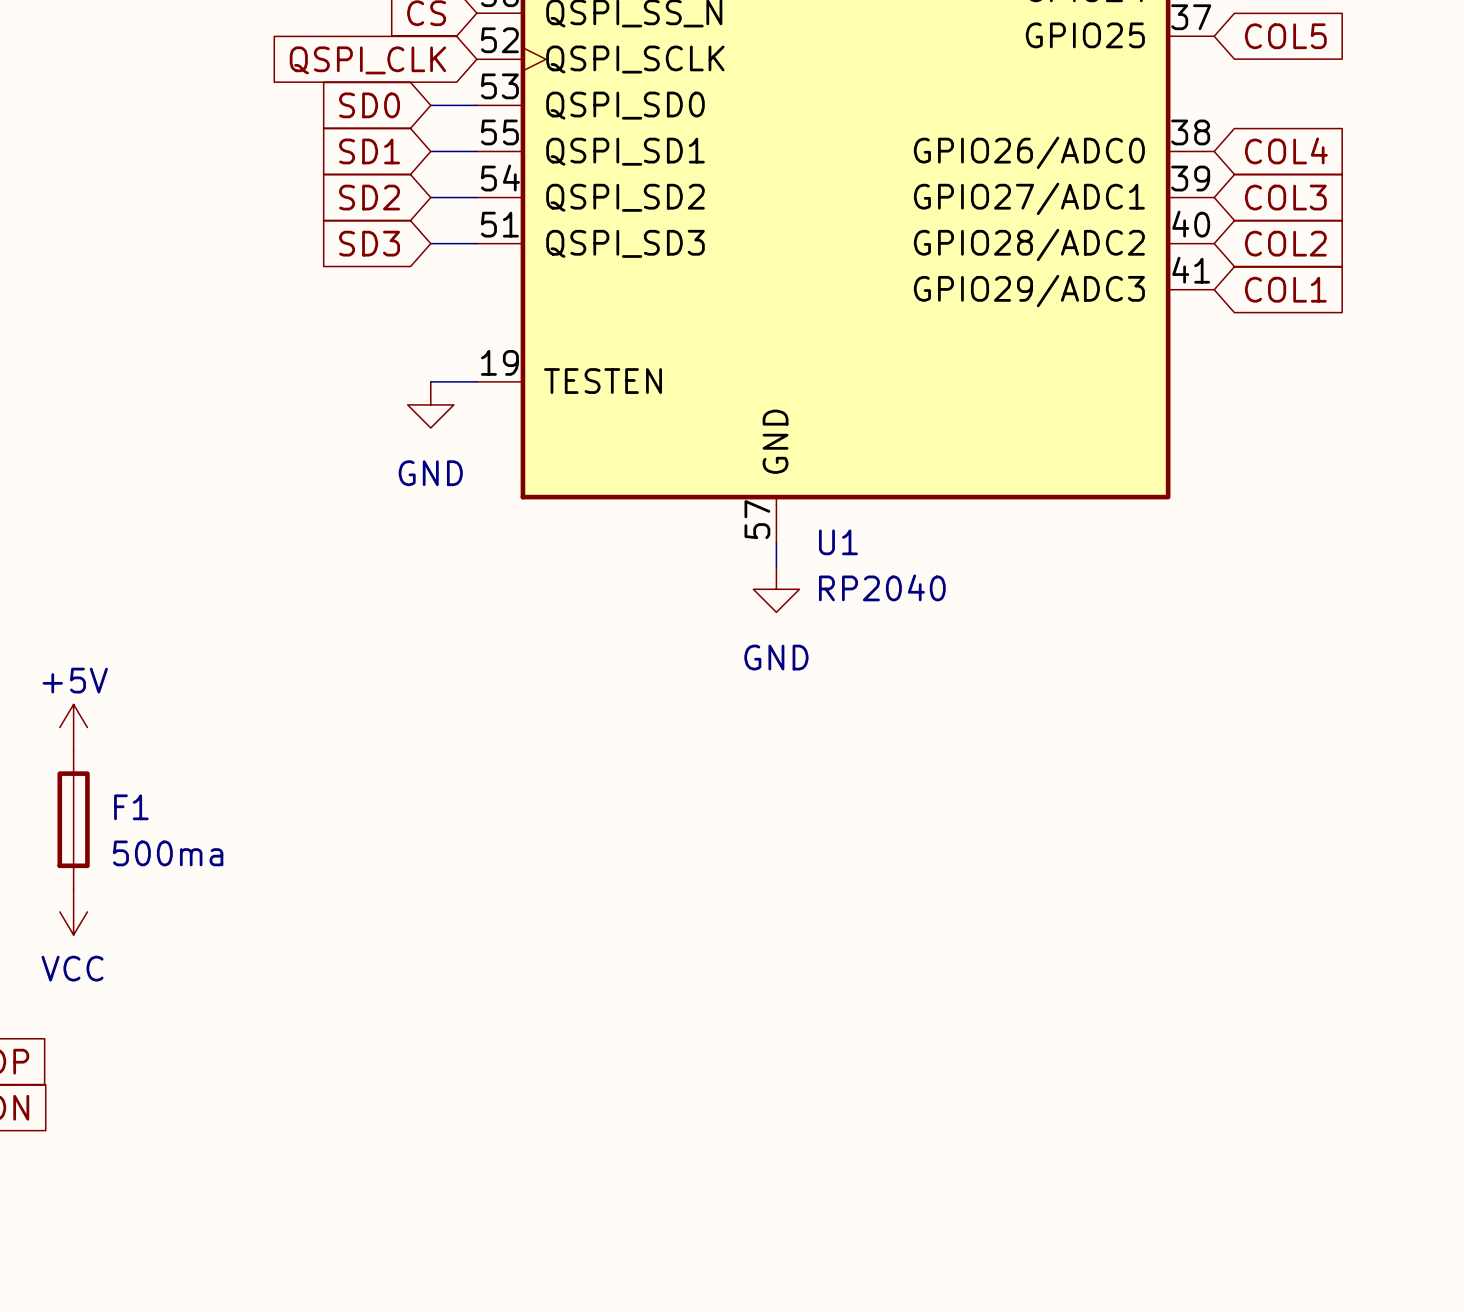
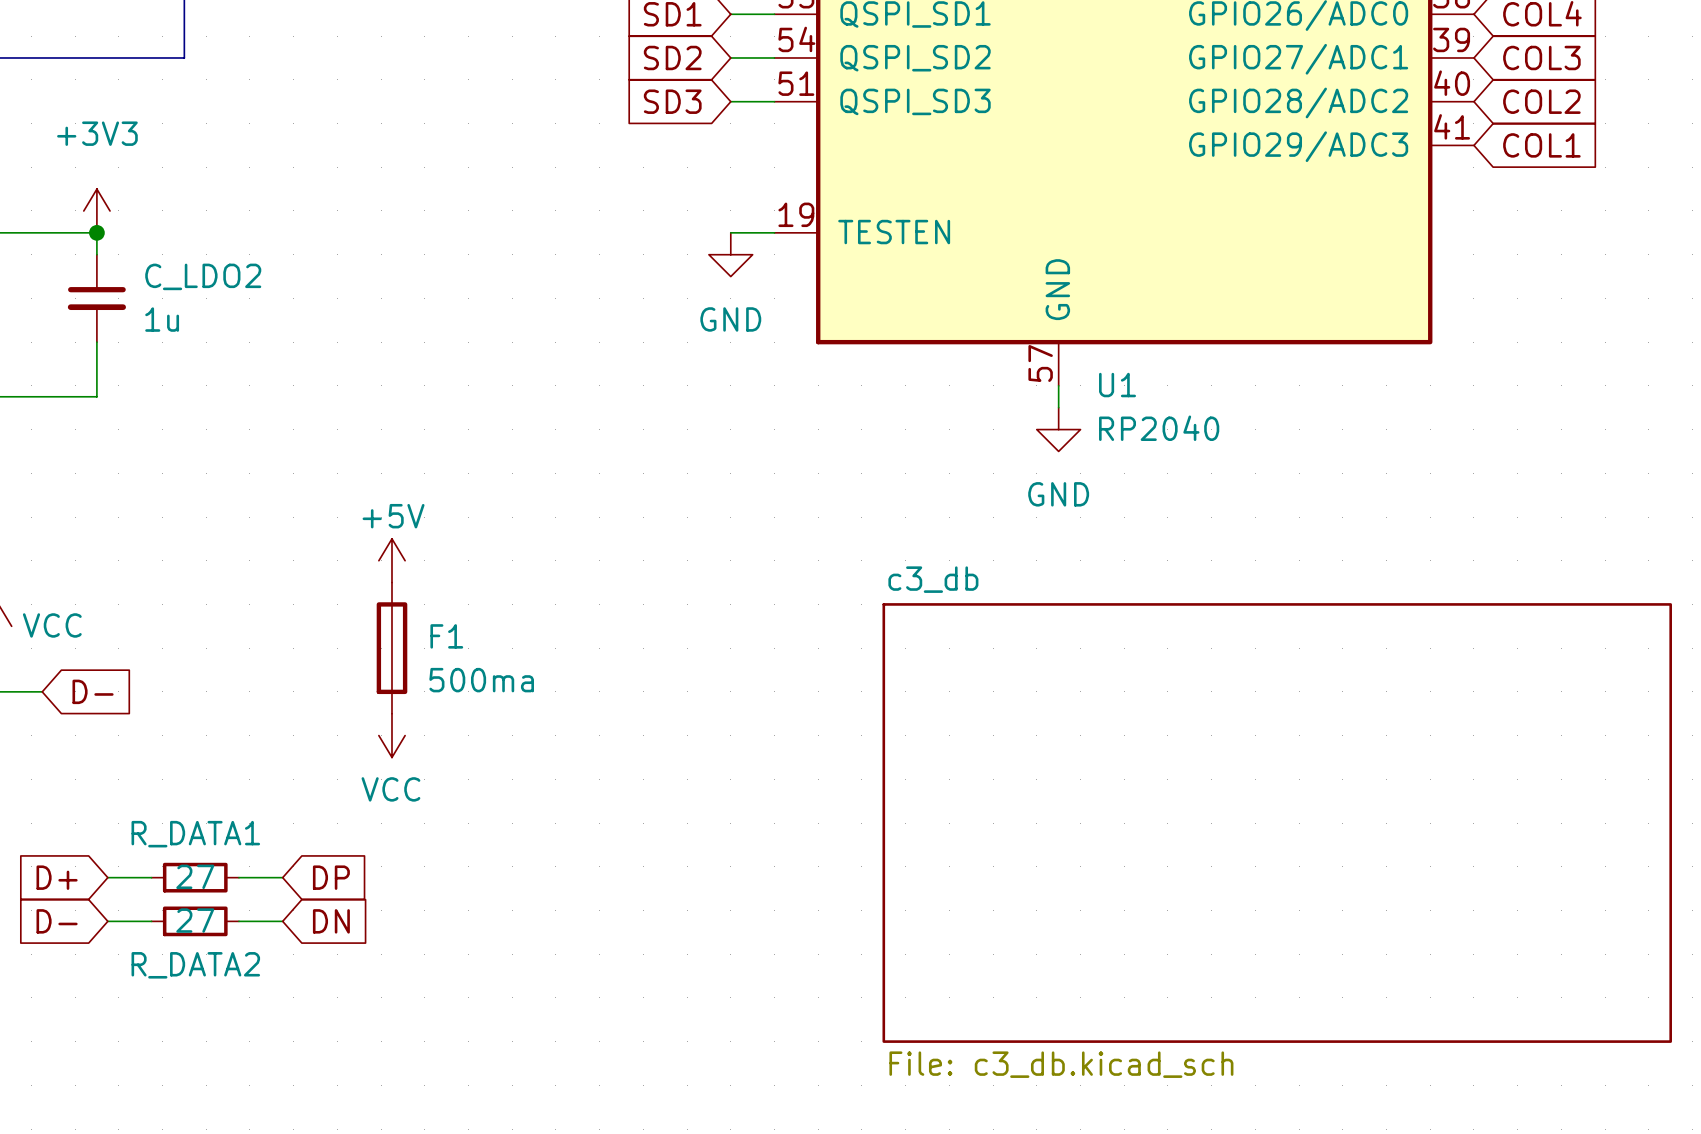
sheet c3_db: none -> File: c3_db.kicad_sch (1277, 823)

